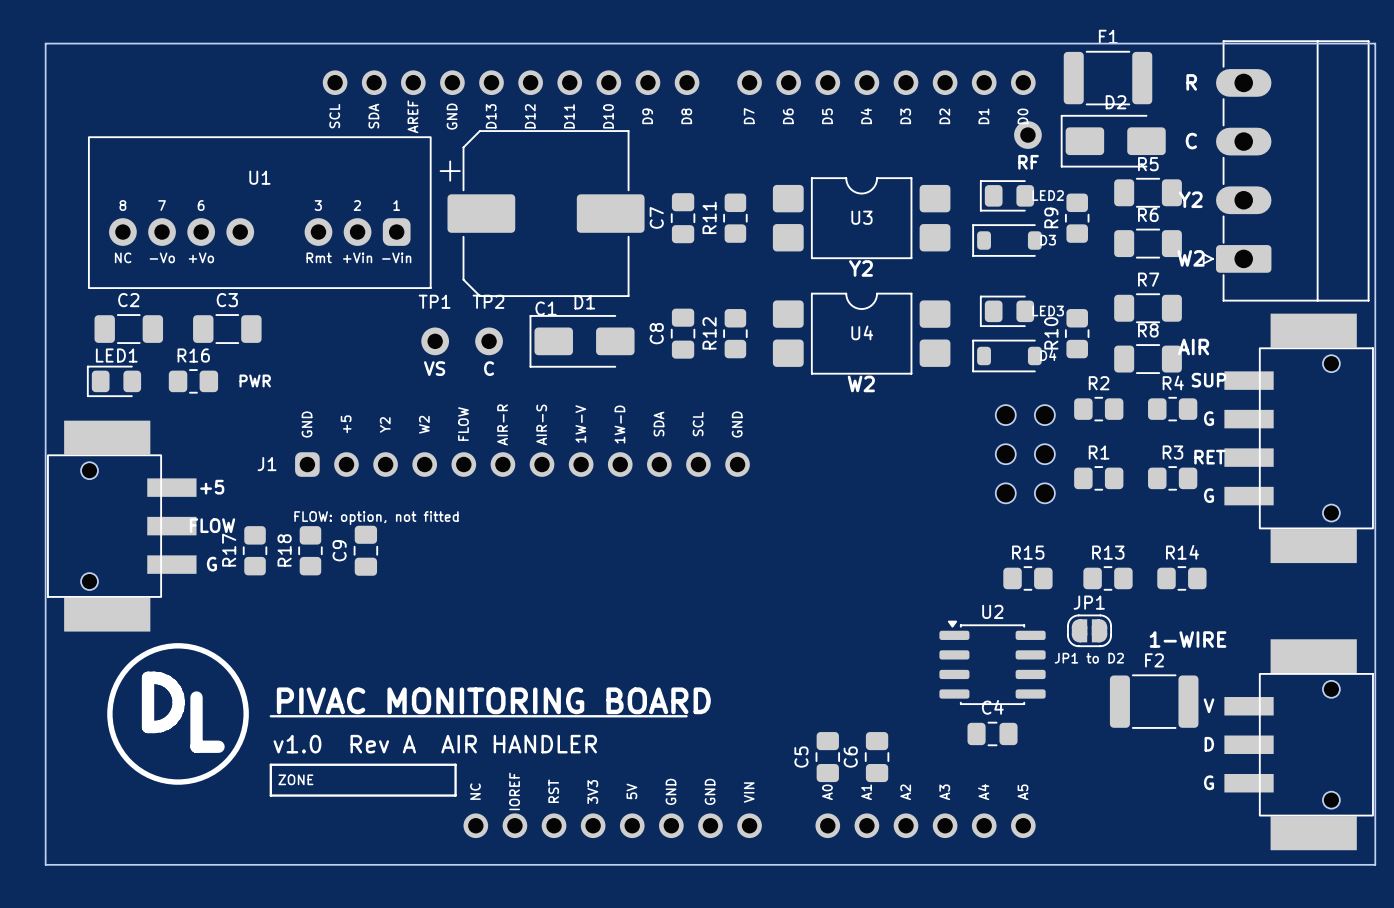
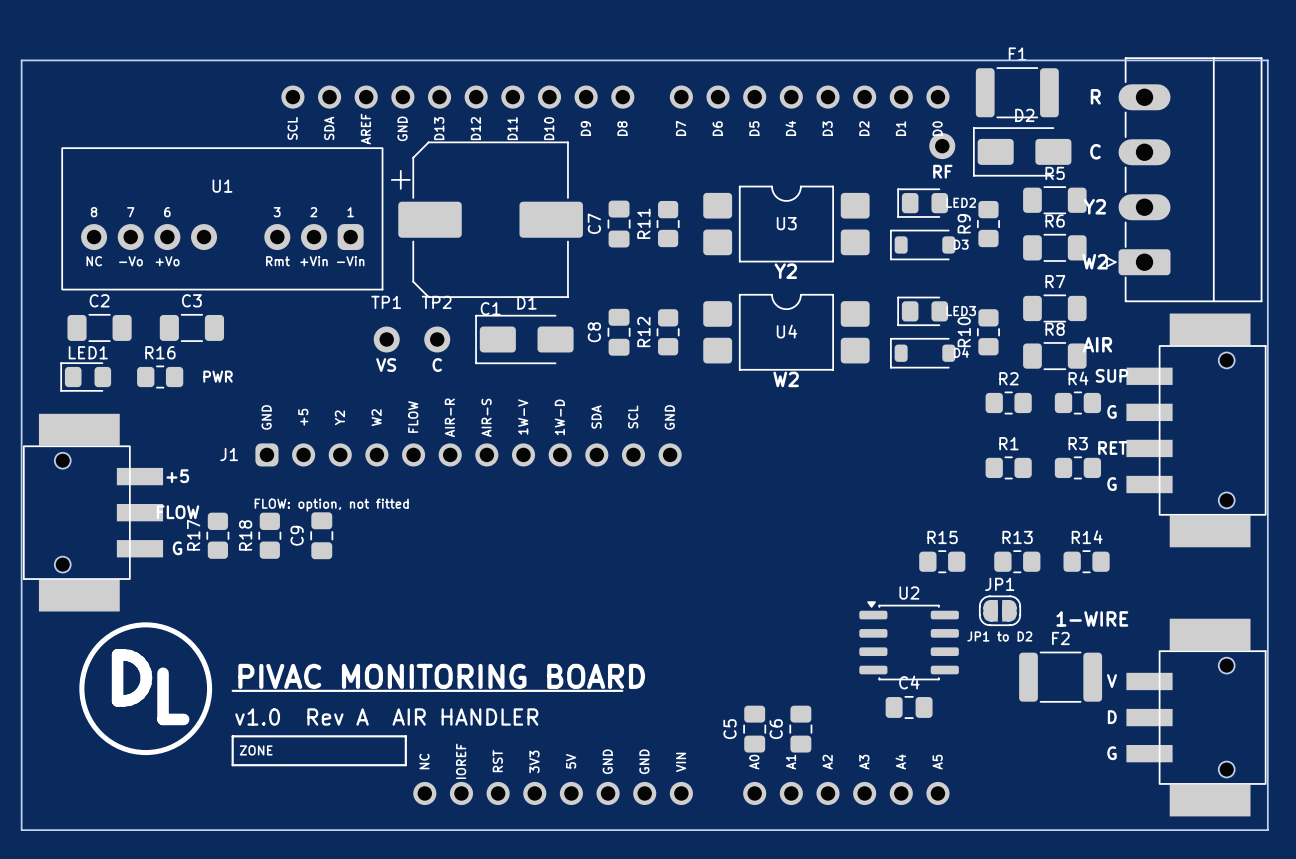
part: (1025, 454) -> none

